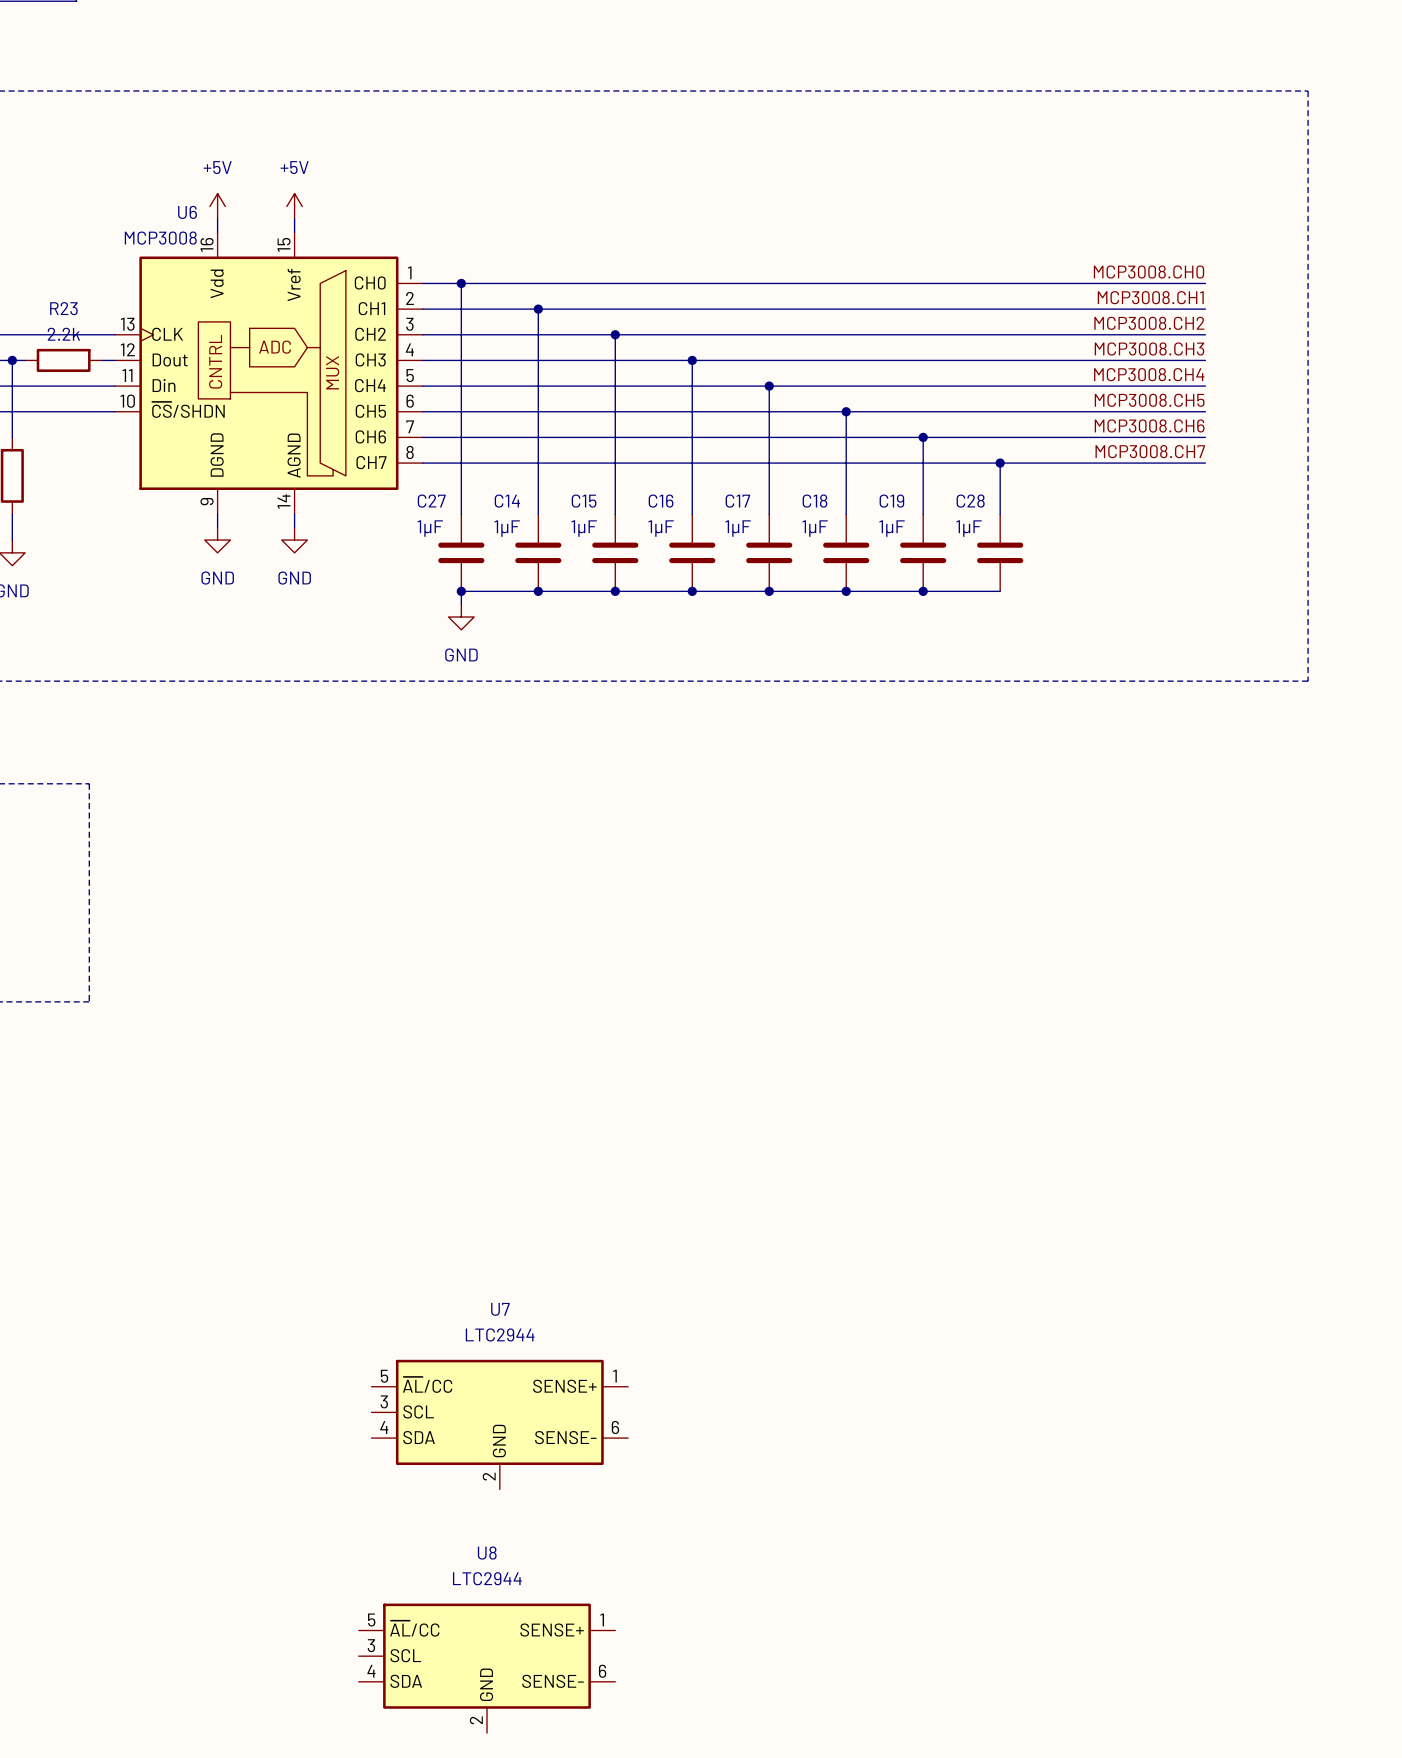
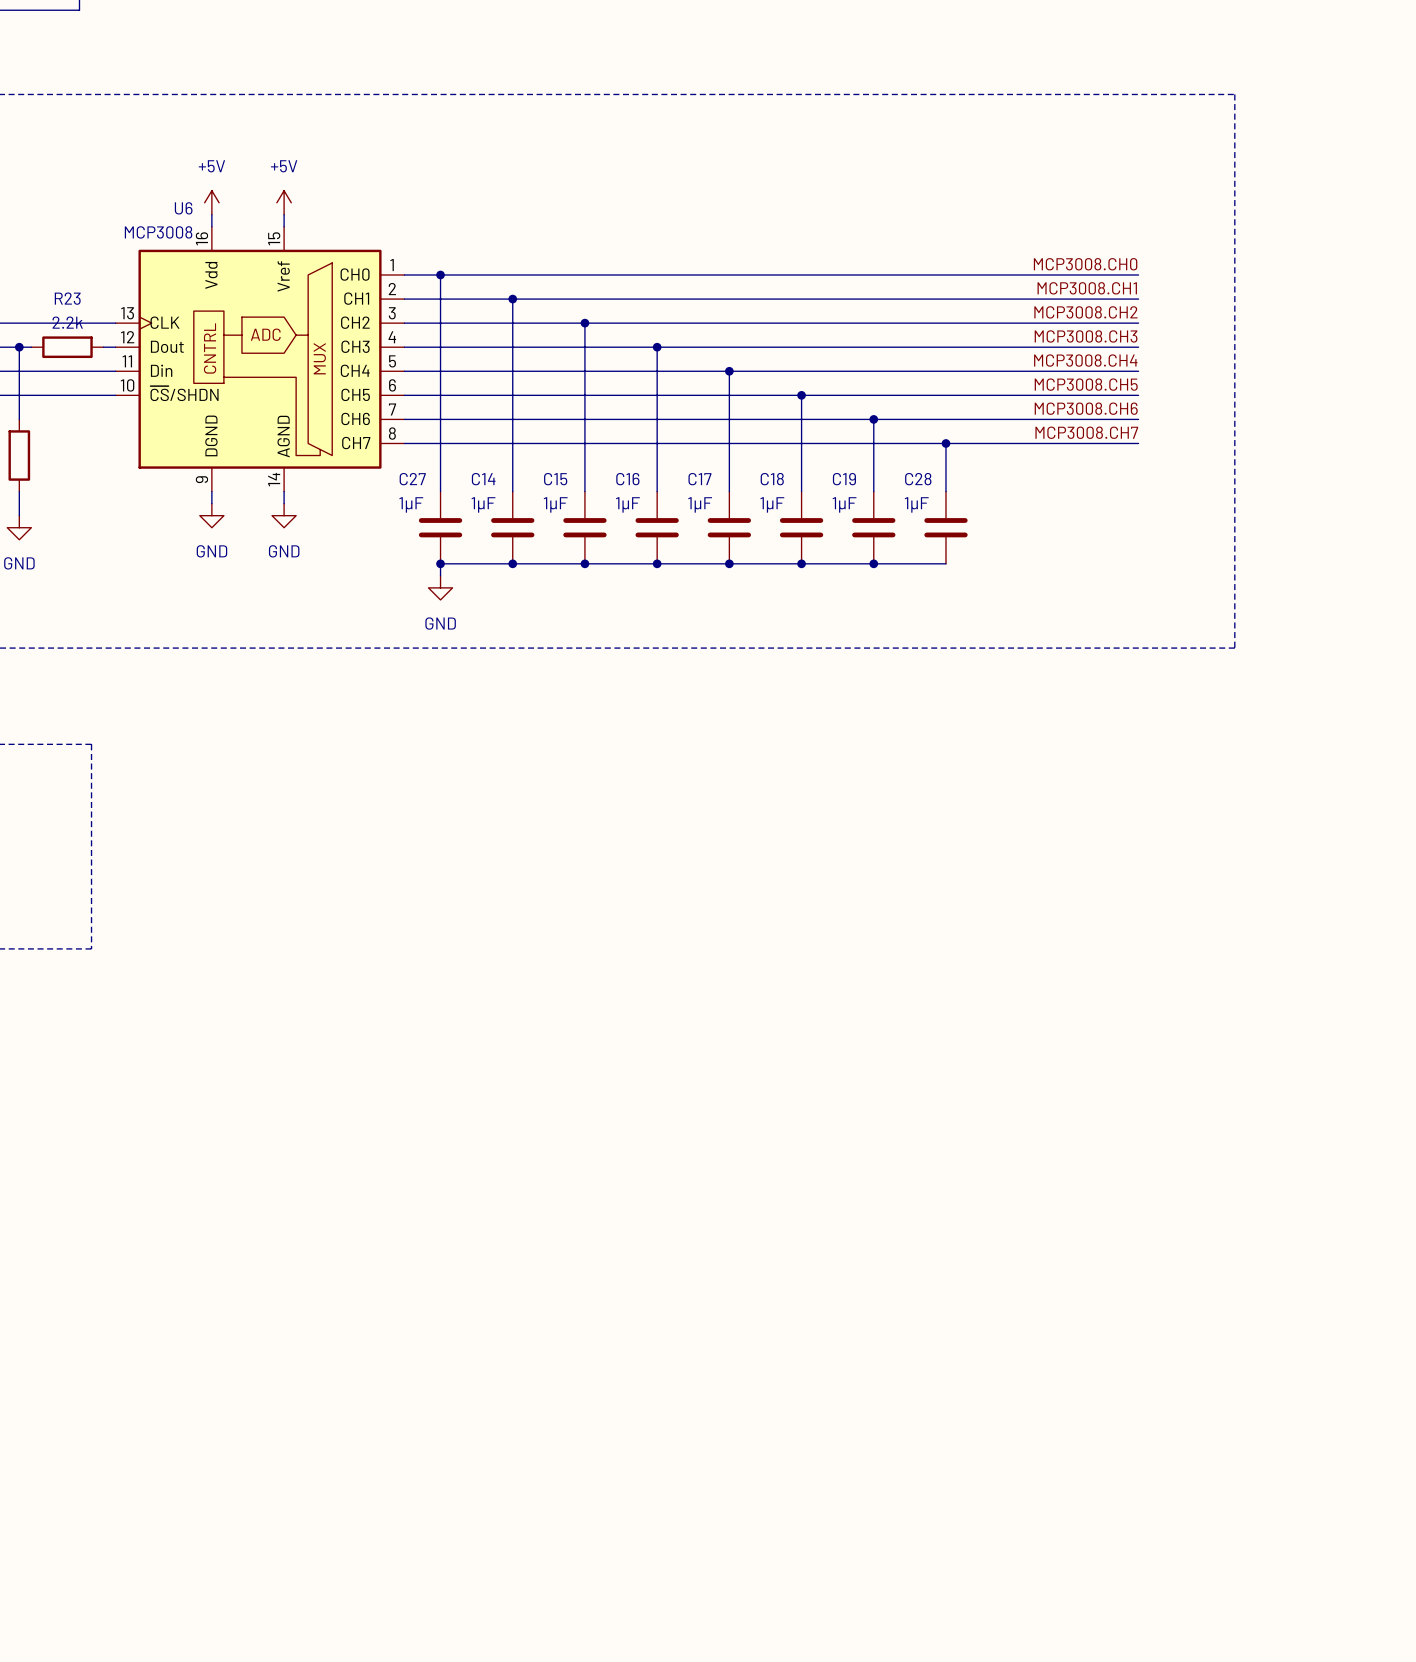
U7: LTC2944 (499, 1424) -> none
U8: LTC2944 (487, 1668) -> none

